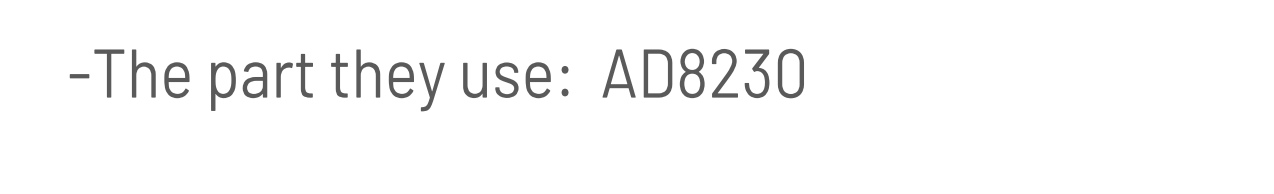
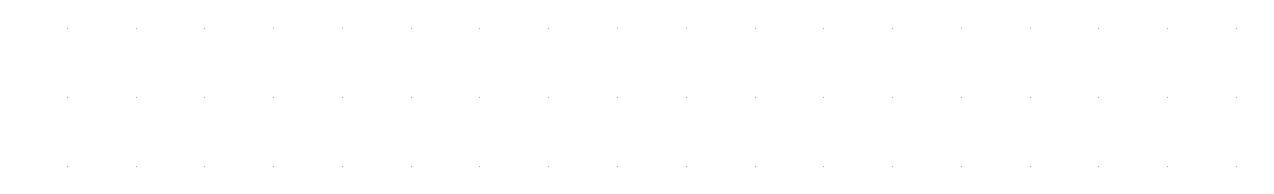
text: -The part they use: AD8230 (436, 80) -> none

